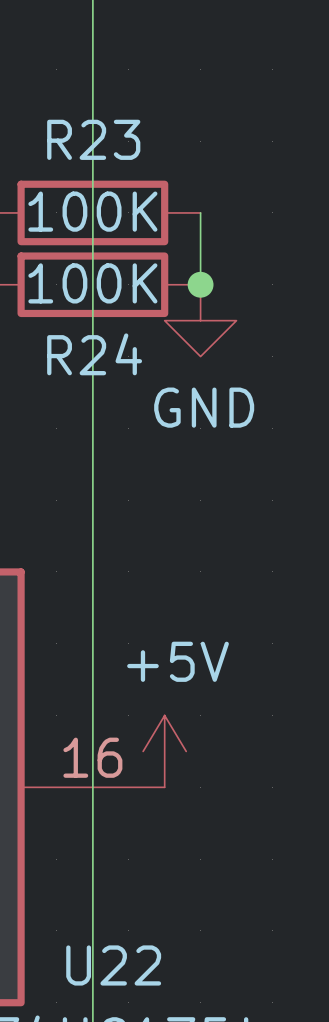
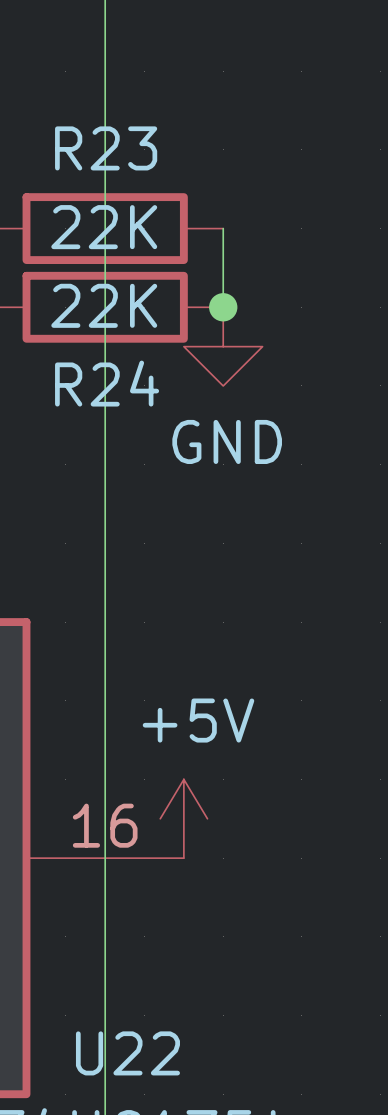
R23 value: 100K (92, 211) -> 22K (104, 227)
R24 value: 100K (92, 283) -> 22K (104, 305)

